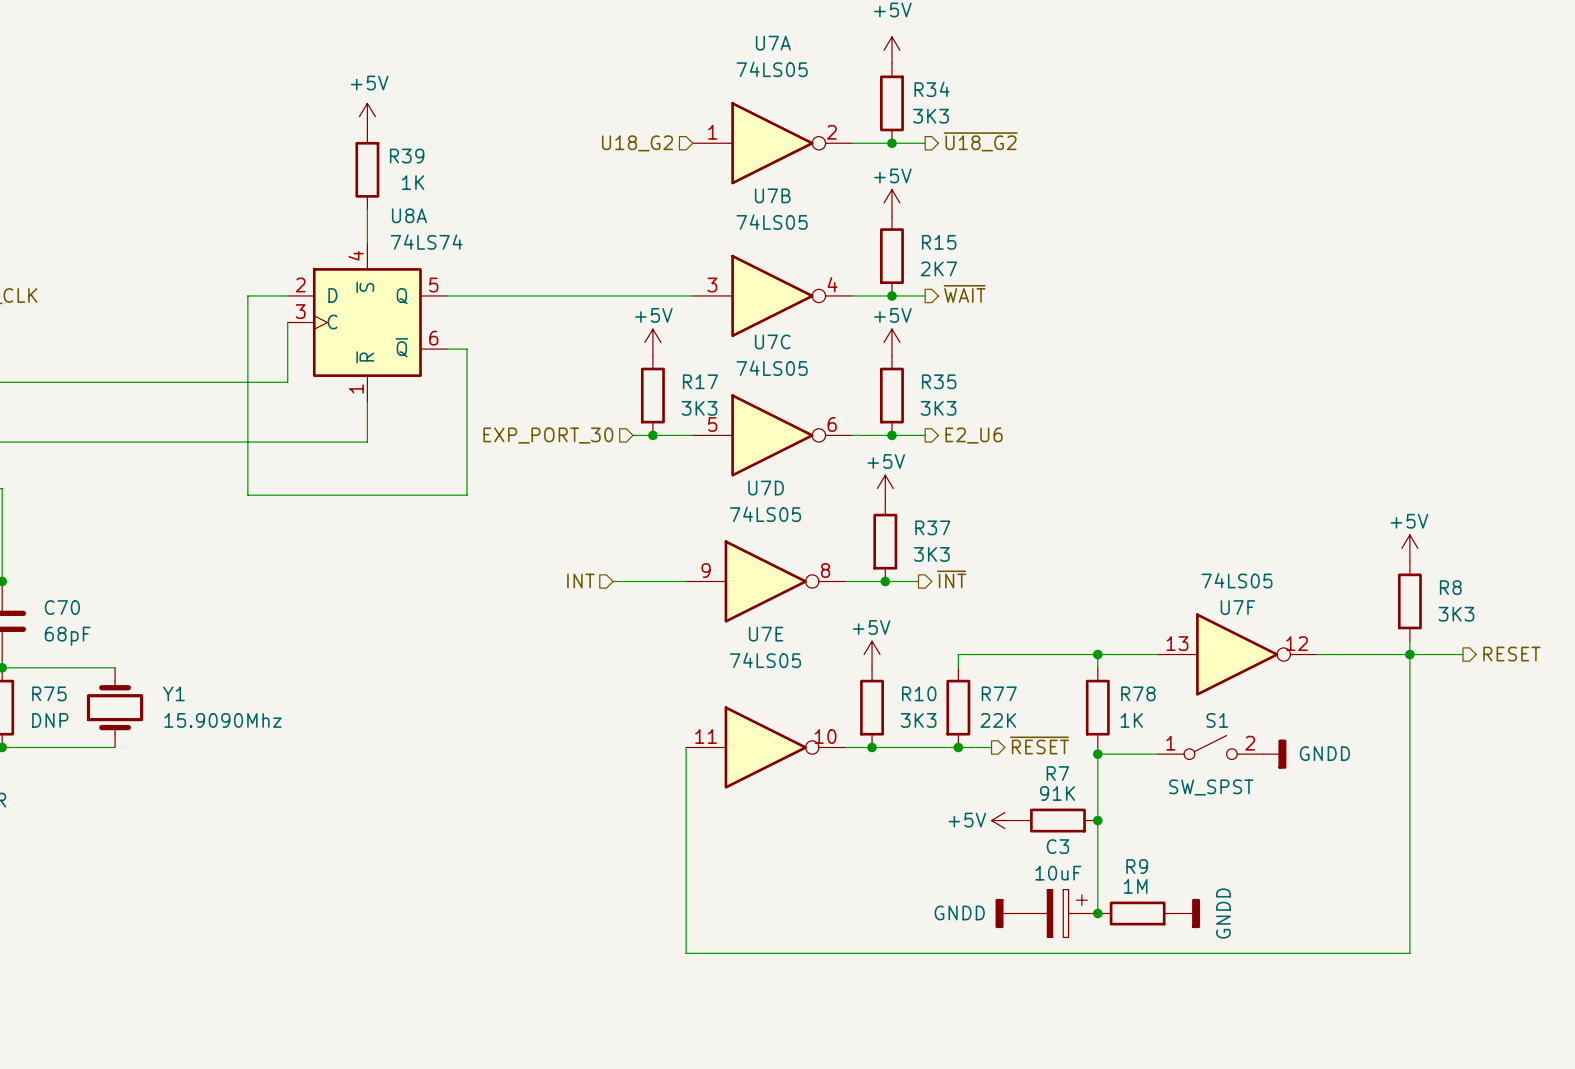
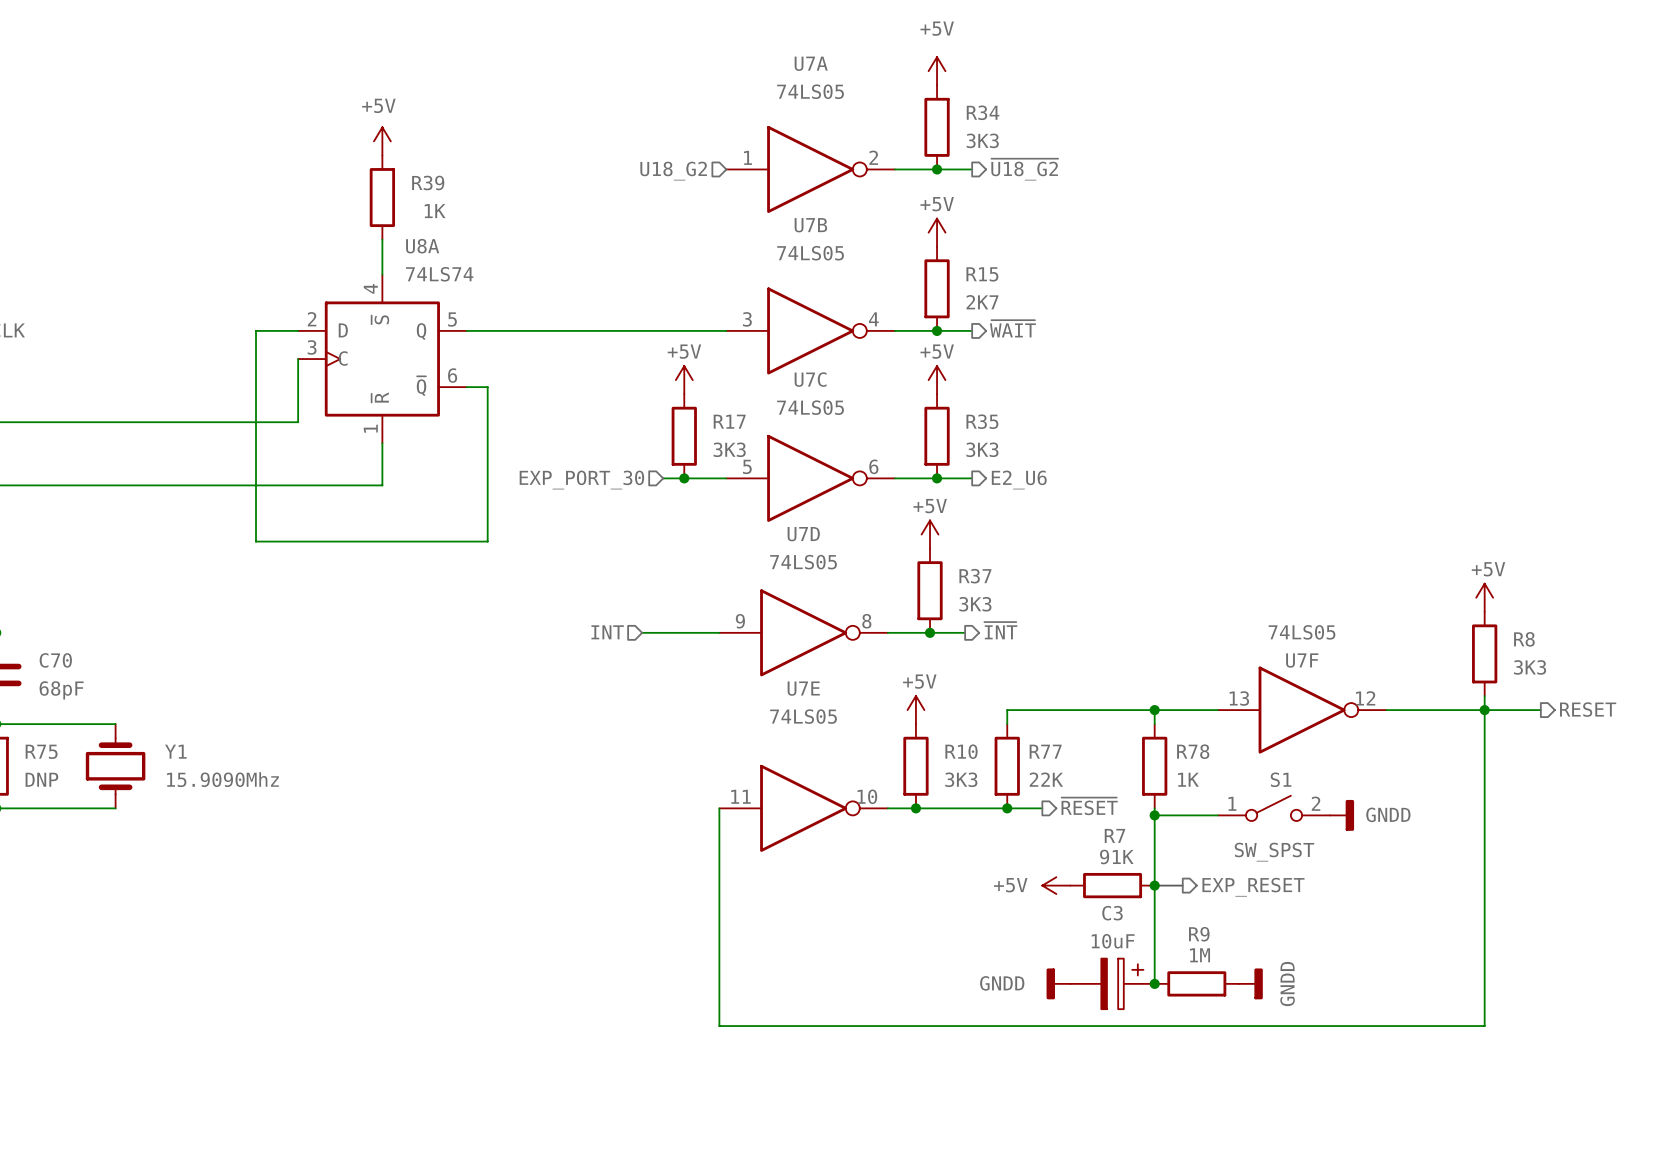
bus: none -> (1154, 885) (1182, 885)
hierarchical label: none -> EXP_RESET (1253, 887)

